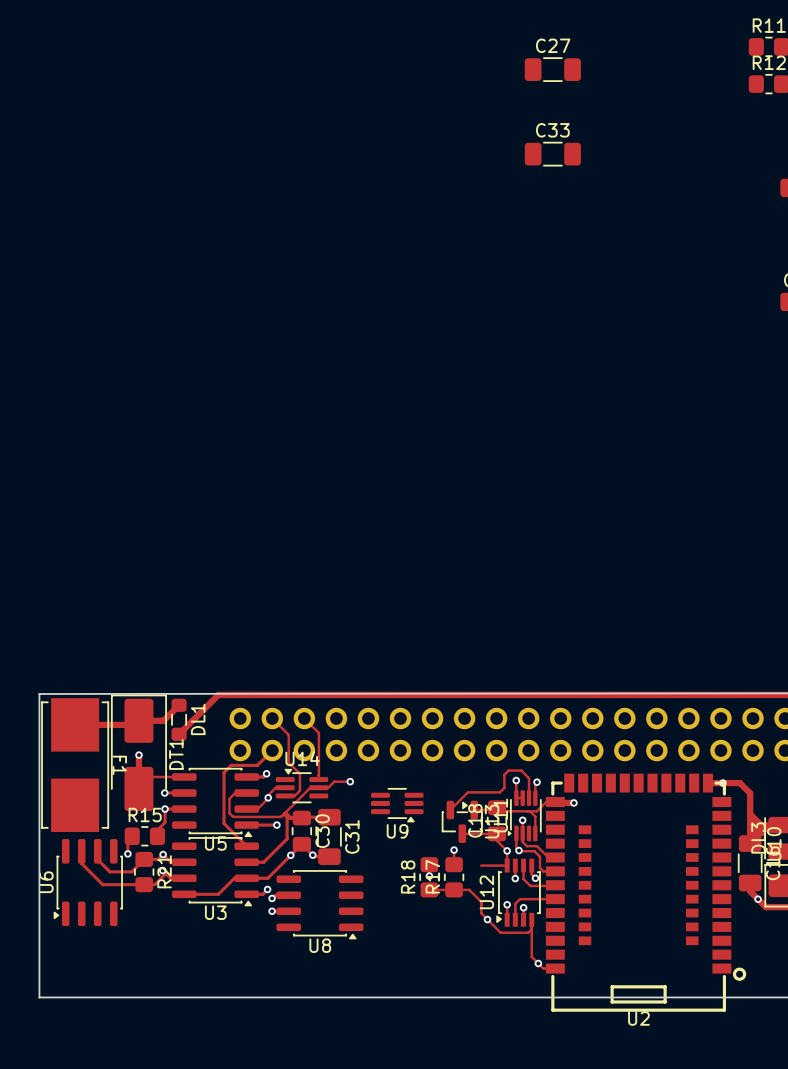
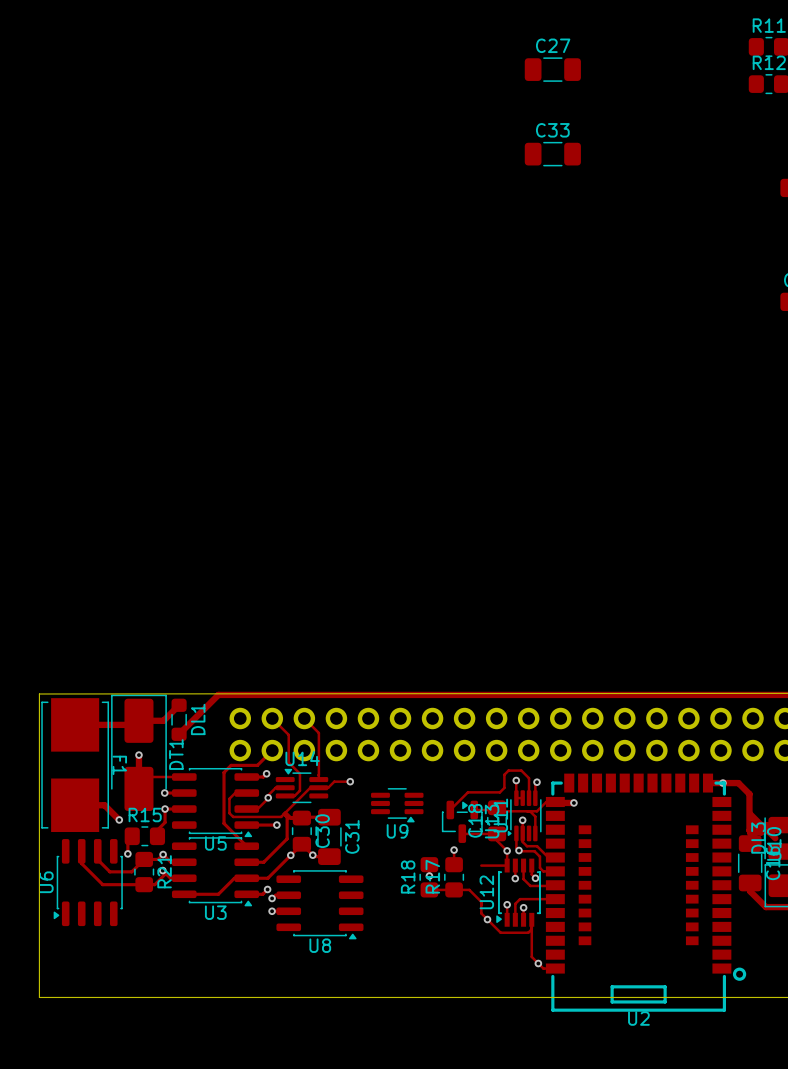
track: (738, 783) (750, 793) (750, 843) (768, 825) -> (738, 783) (749, 794) (749, 830) (768, 831) (775, 838)
track: none -> (75, 805) (104, 805) (119, 819)
via: none -> (119, 819)
via: (758, 899) -> none

